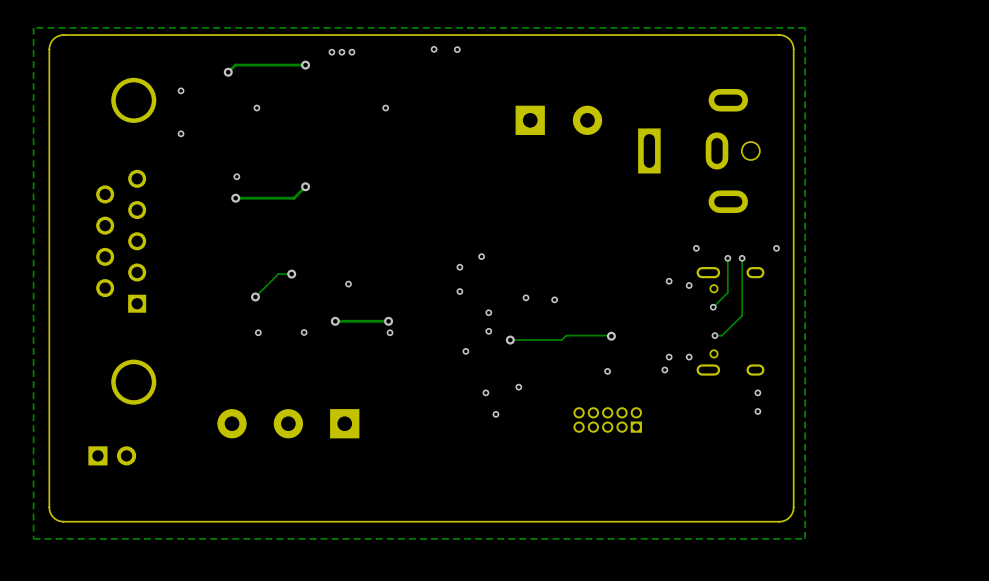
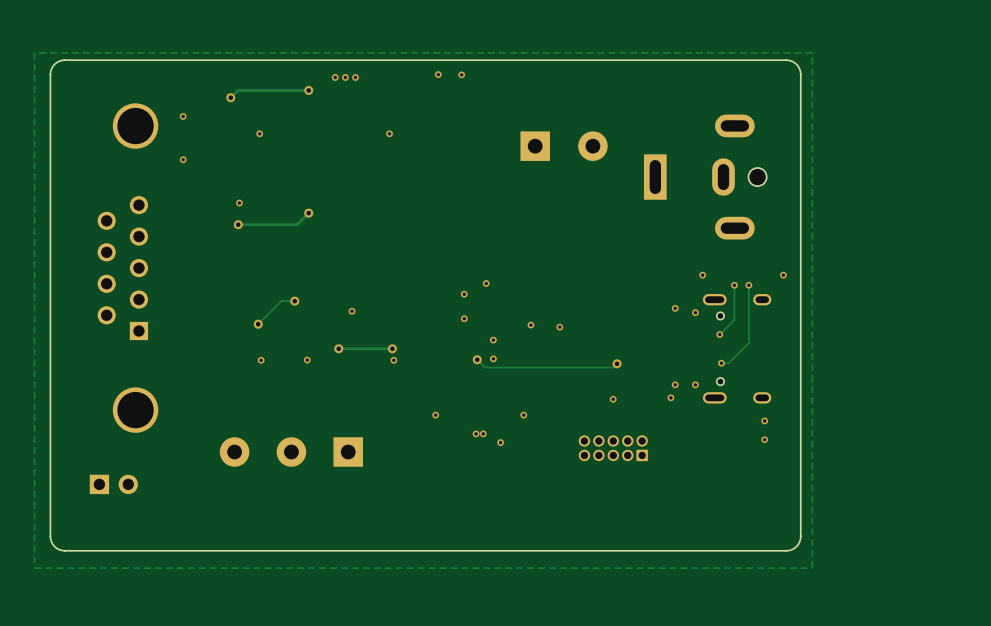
track: (611, 336) (566, 335) (561, 340) (510, 340) -> (617, 363) (613, 367) (485, 367) (477, 359)
via position: (510, 340) -> (477, 359)
via: (465, 351) -> none
via: none -> (435, 415)
via: (485, 392) -> none
via: none -> (476, 433)
via: none -> (483, 433)

